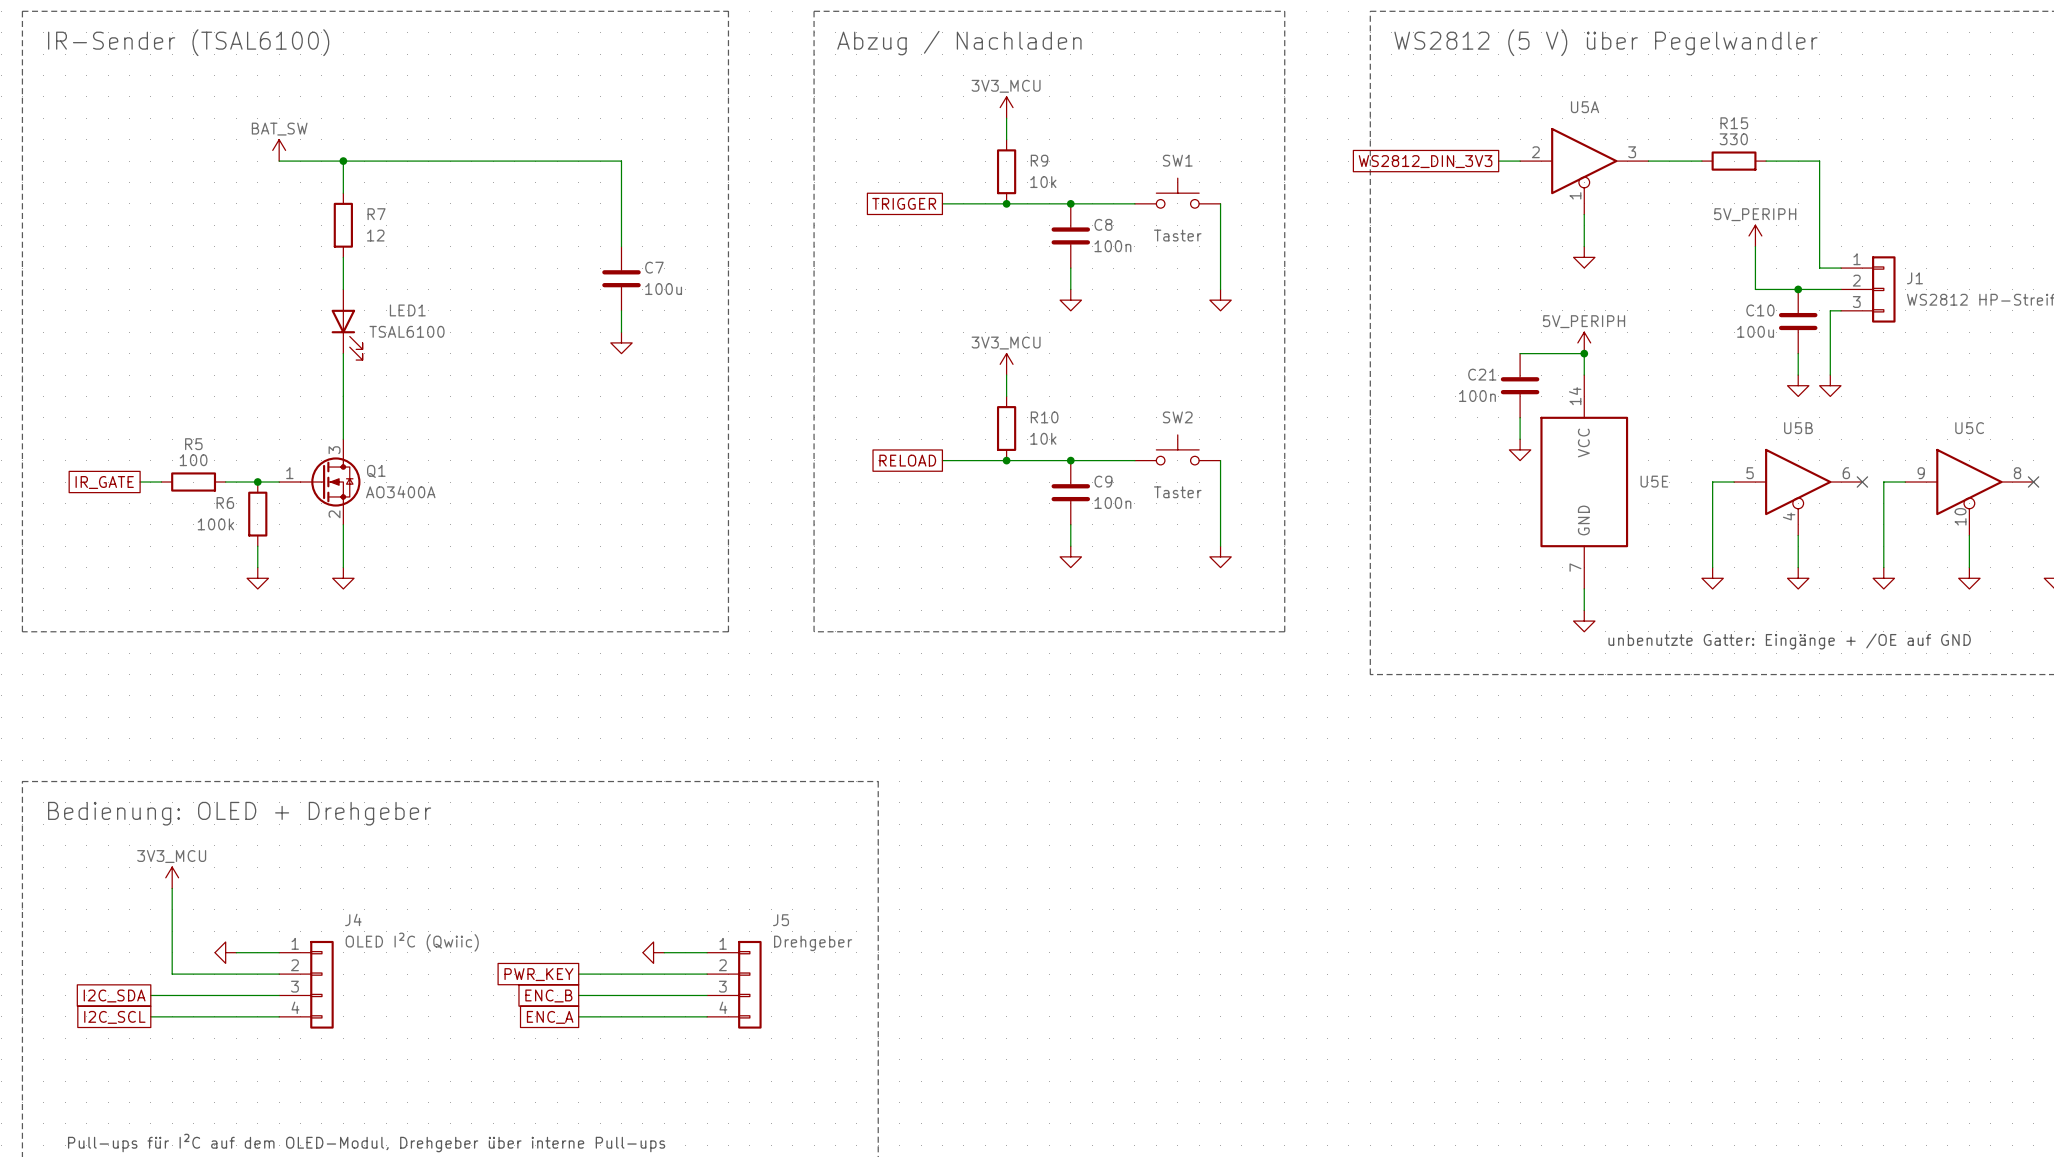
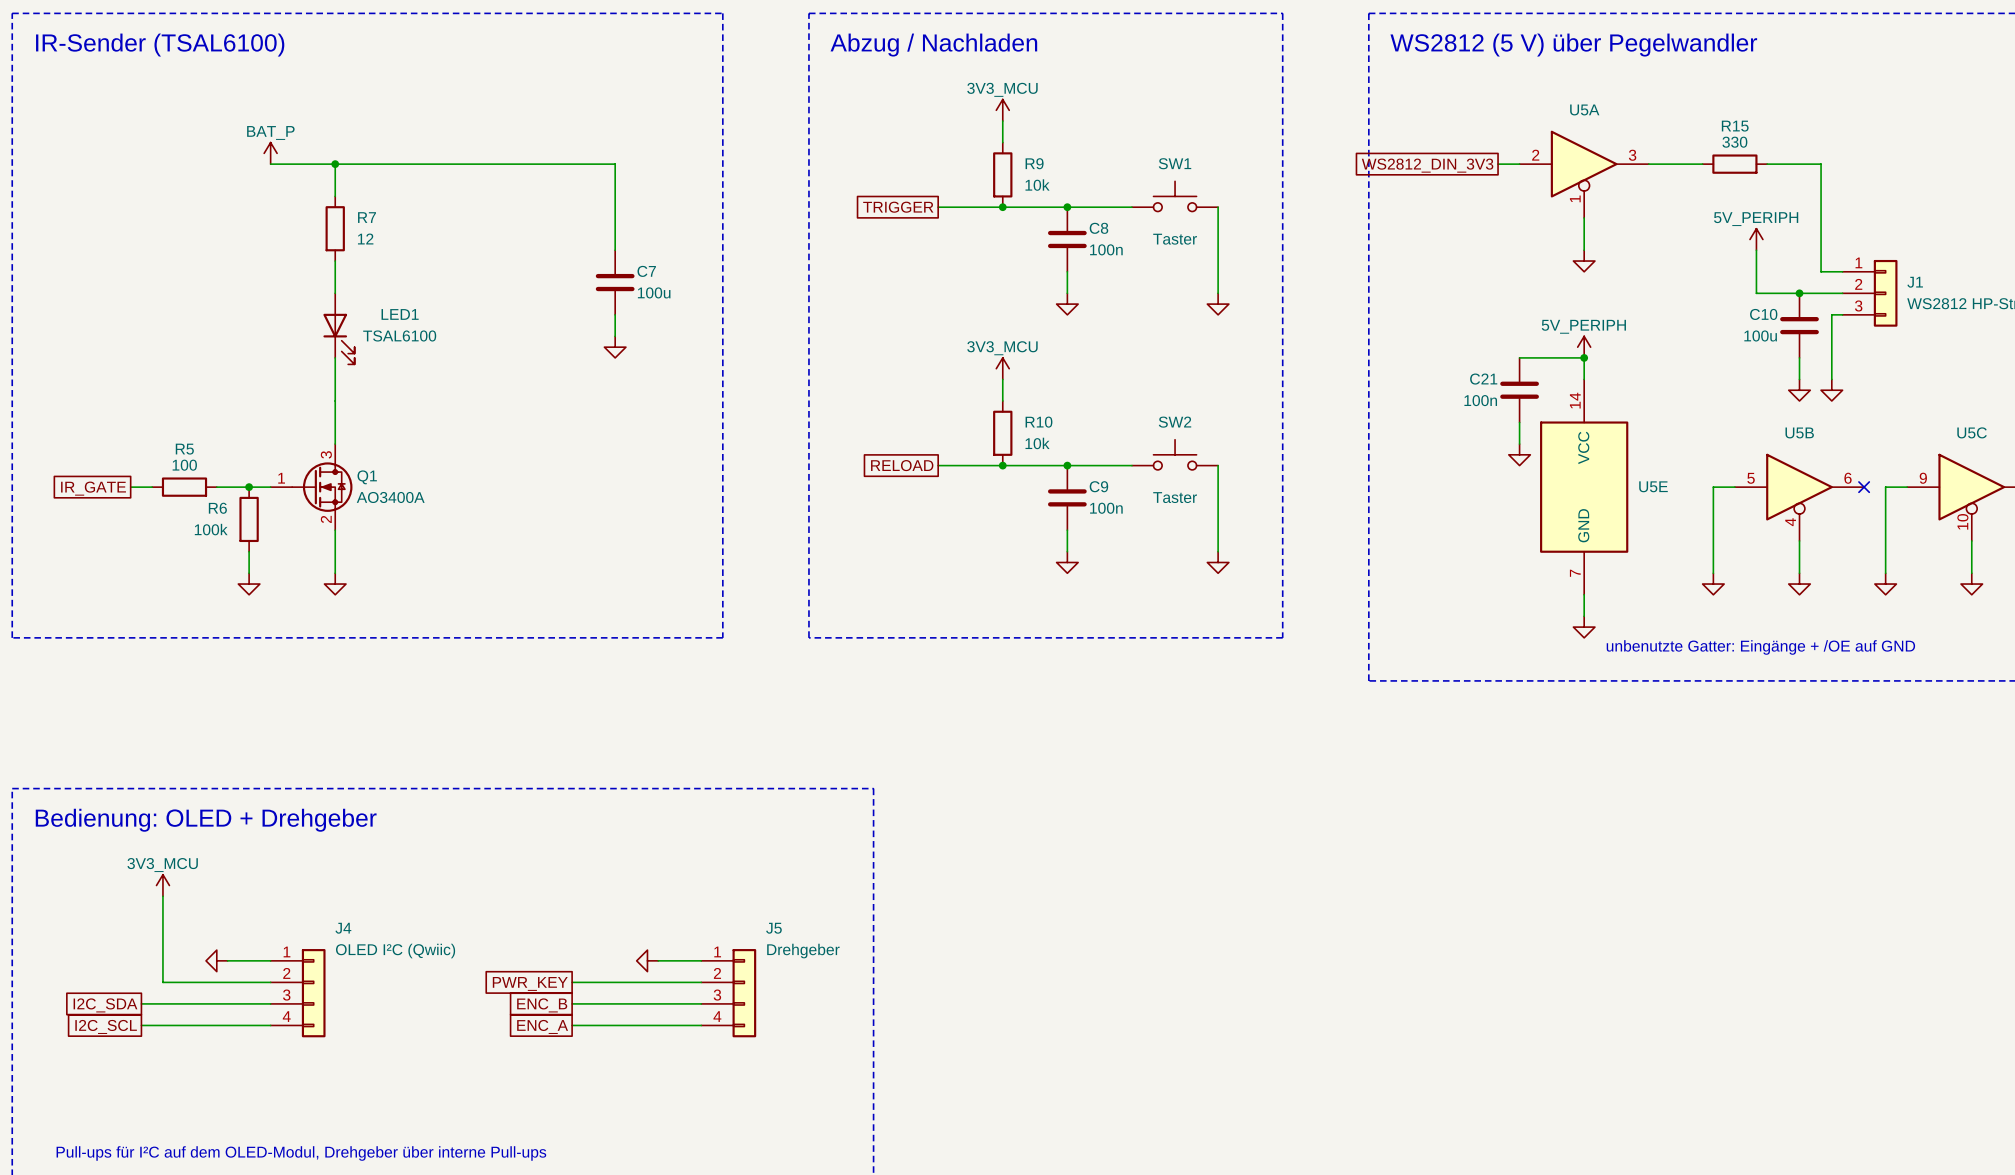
power symbol: BAT_SW (279, 150) -> BAT_P (270, 153)

